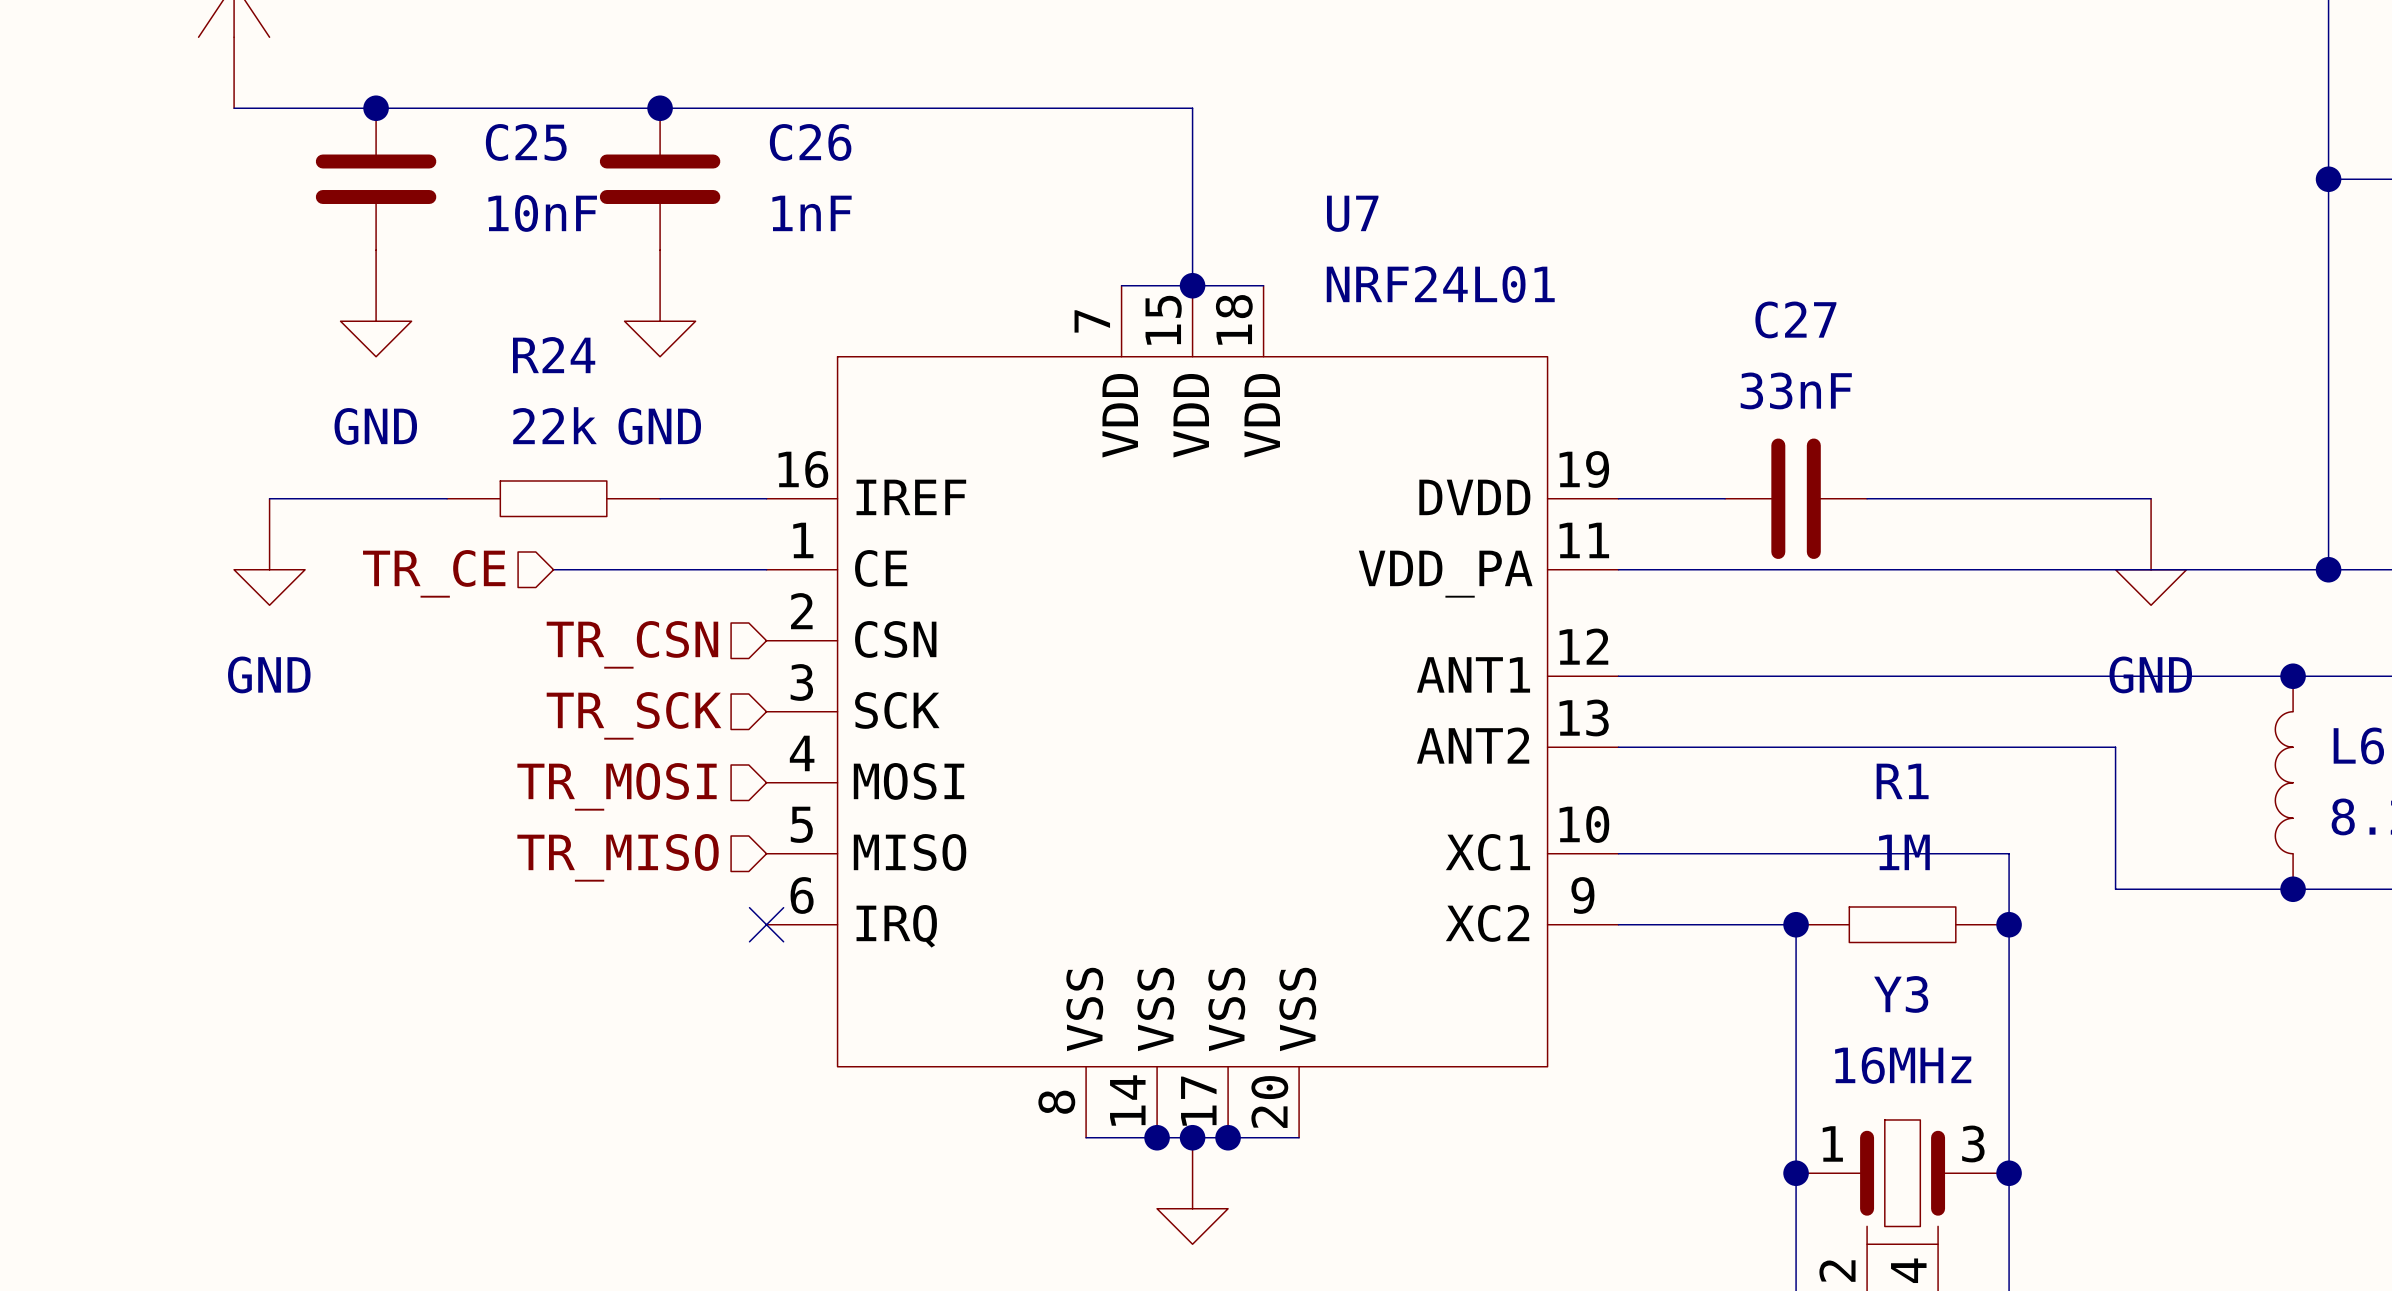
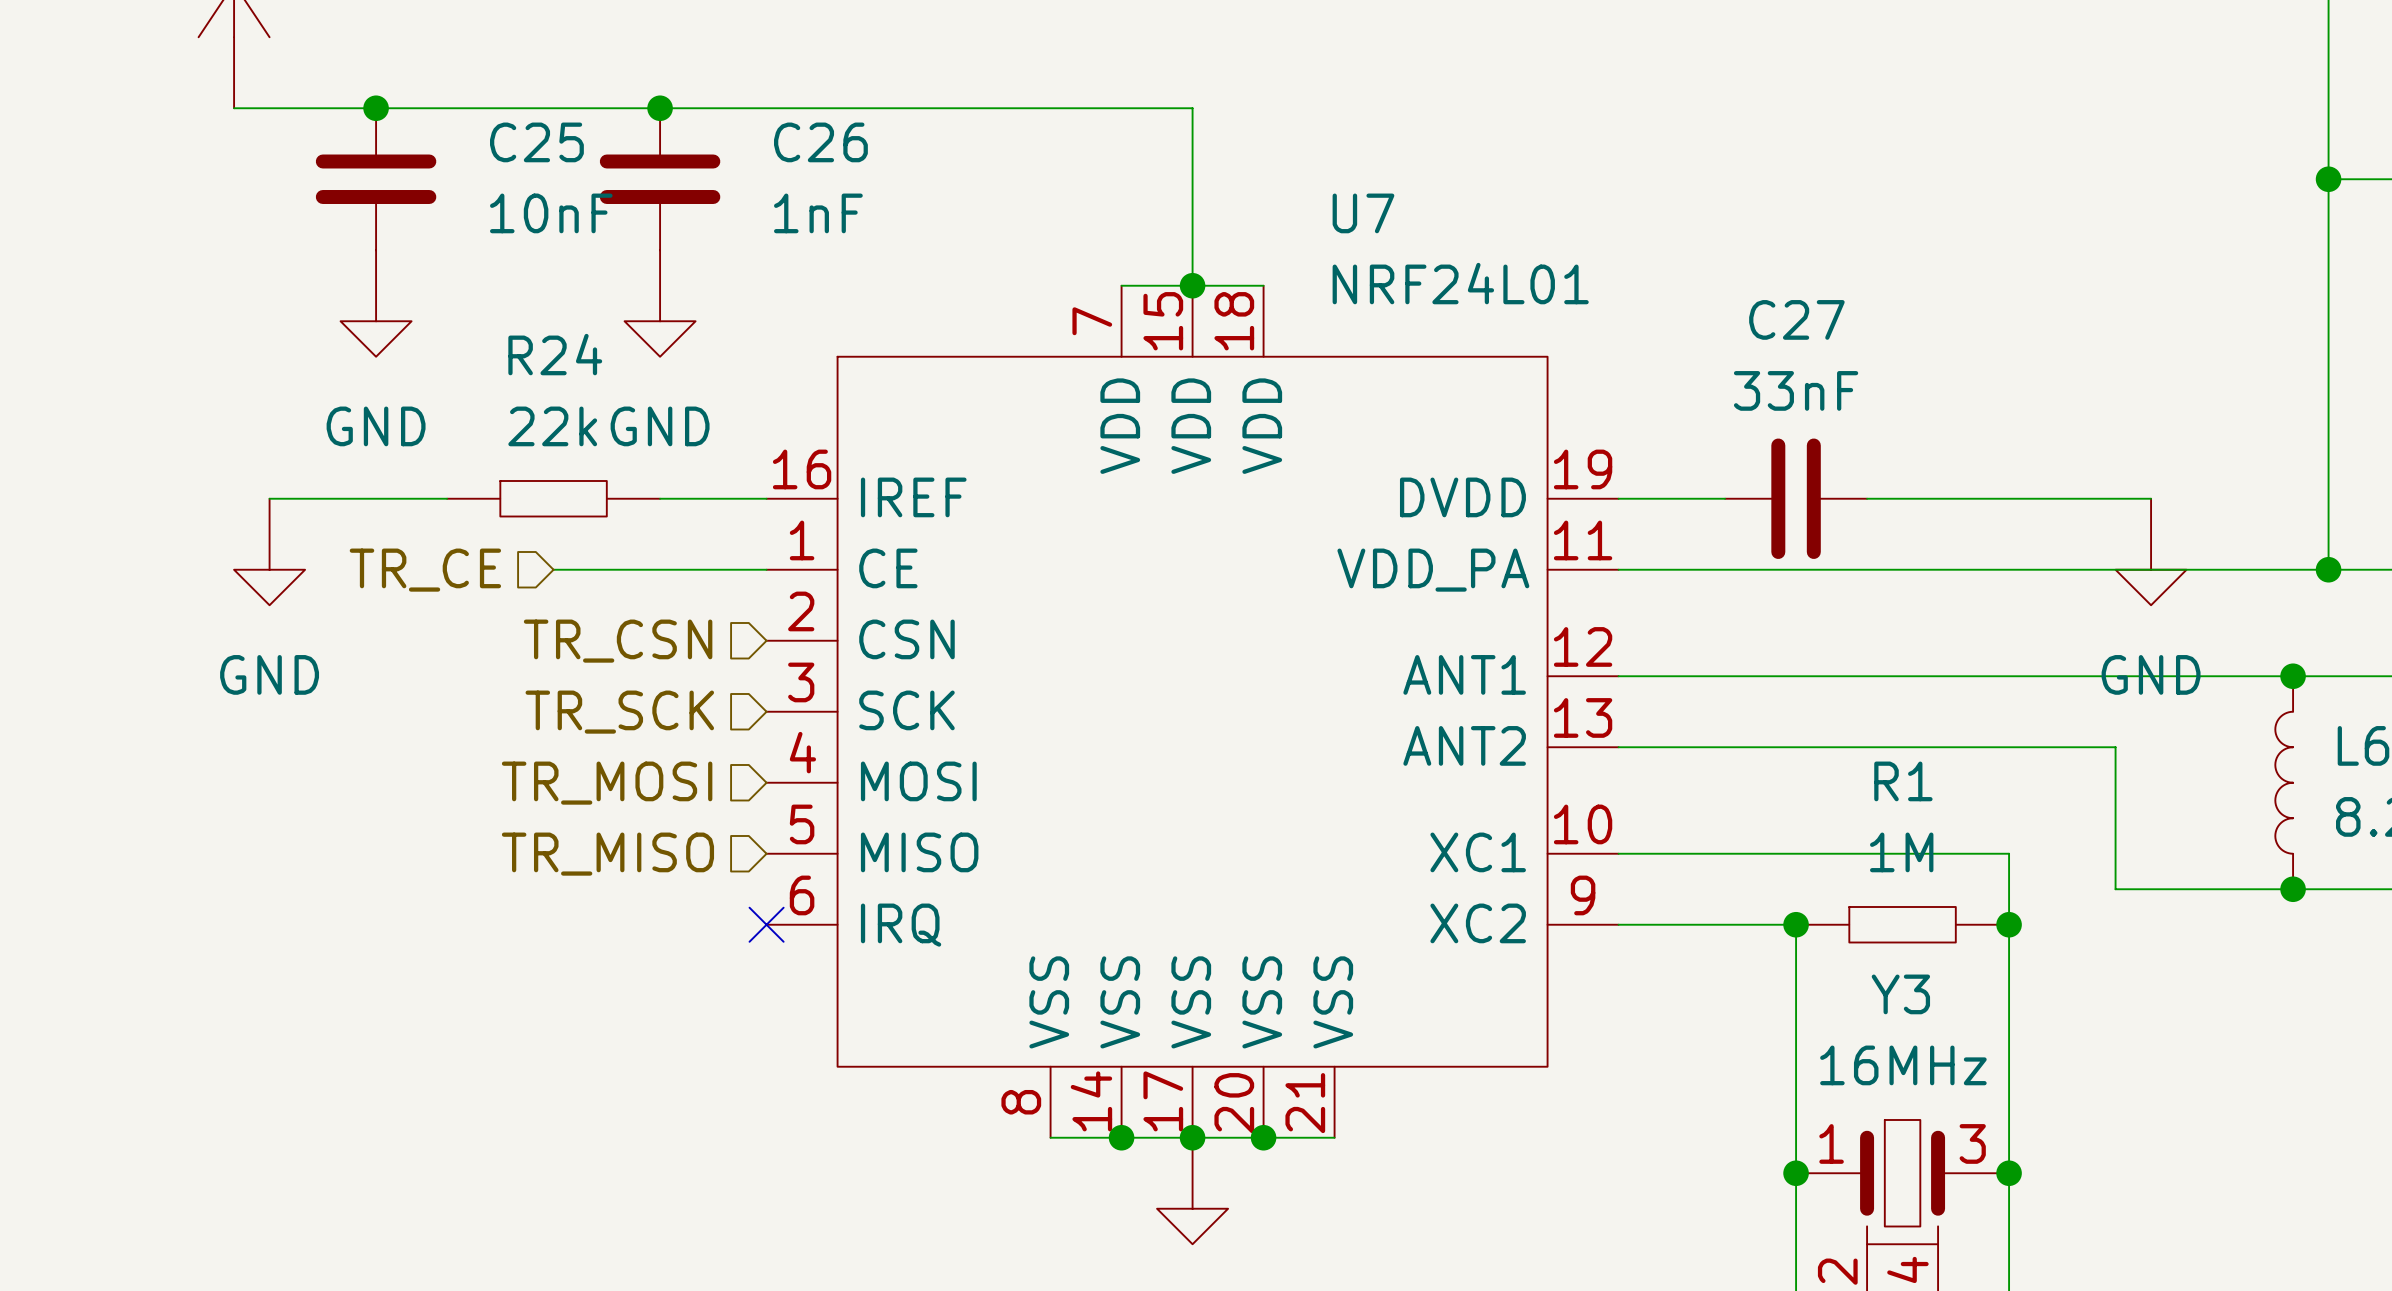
U7 symbol: [766, 285, 1619, 1138] -> [766, 285, 1619, 1138]
wire: none -> (1050, 1137) (1086, 1137)
junction position: (1157, 1137) -> (1121, 1137)
junction position: (1228, 1137) -> (1263, 1137)
wire: none -> (1299, 1137) (1334, 1137)

